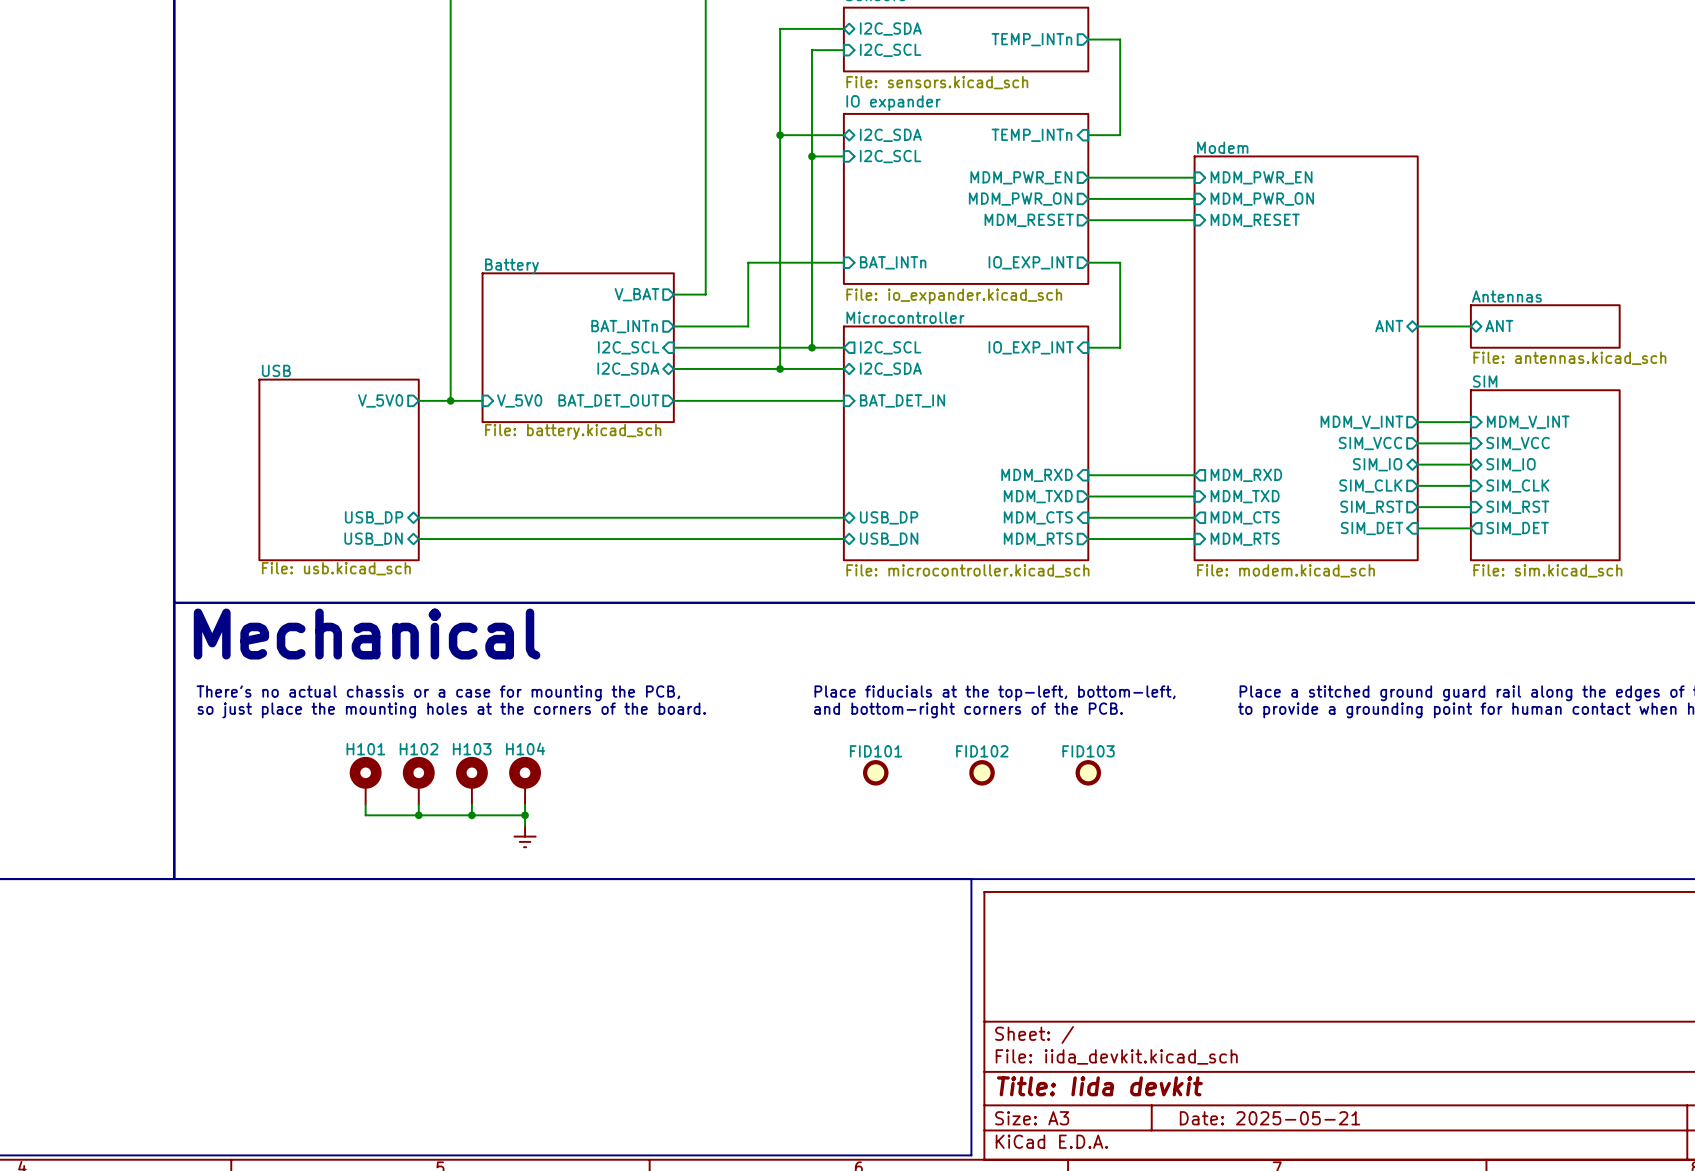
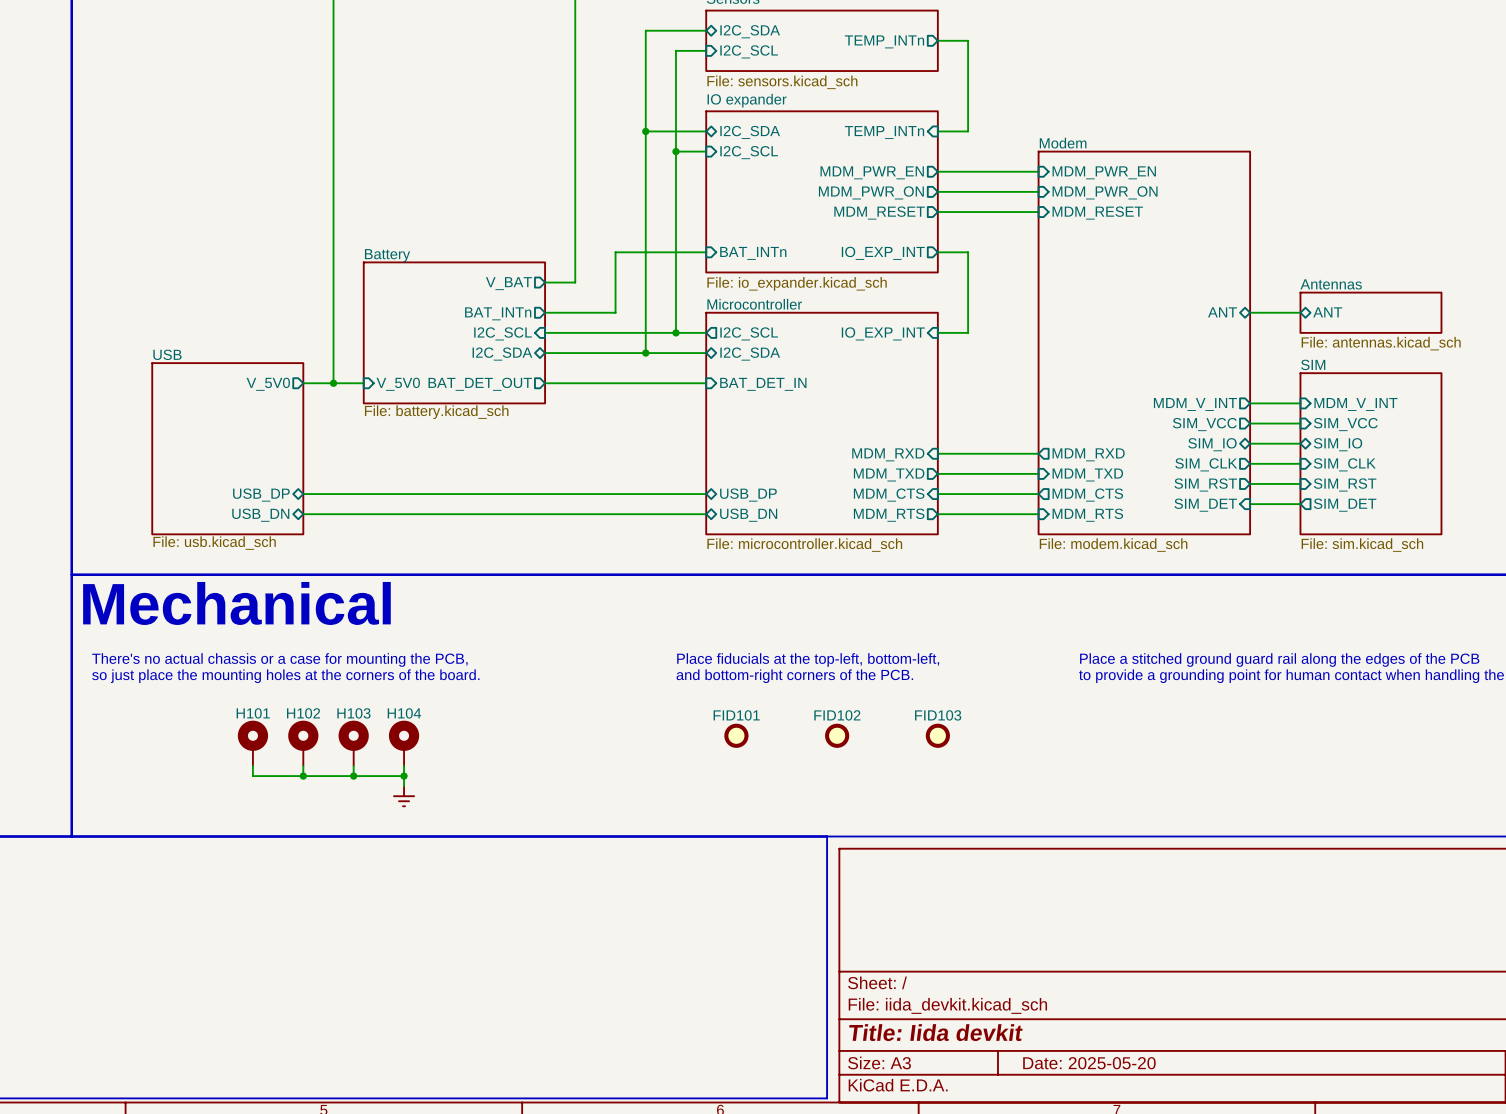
title block: Date: 2025-05-21 (1270, 1118) -> Date: 2025-05-20 (1089, 1063)

